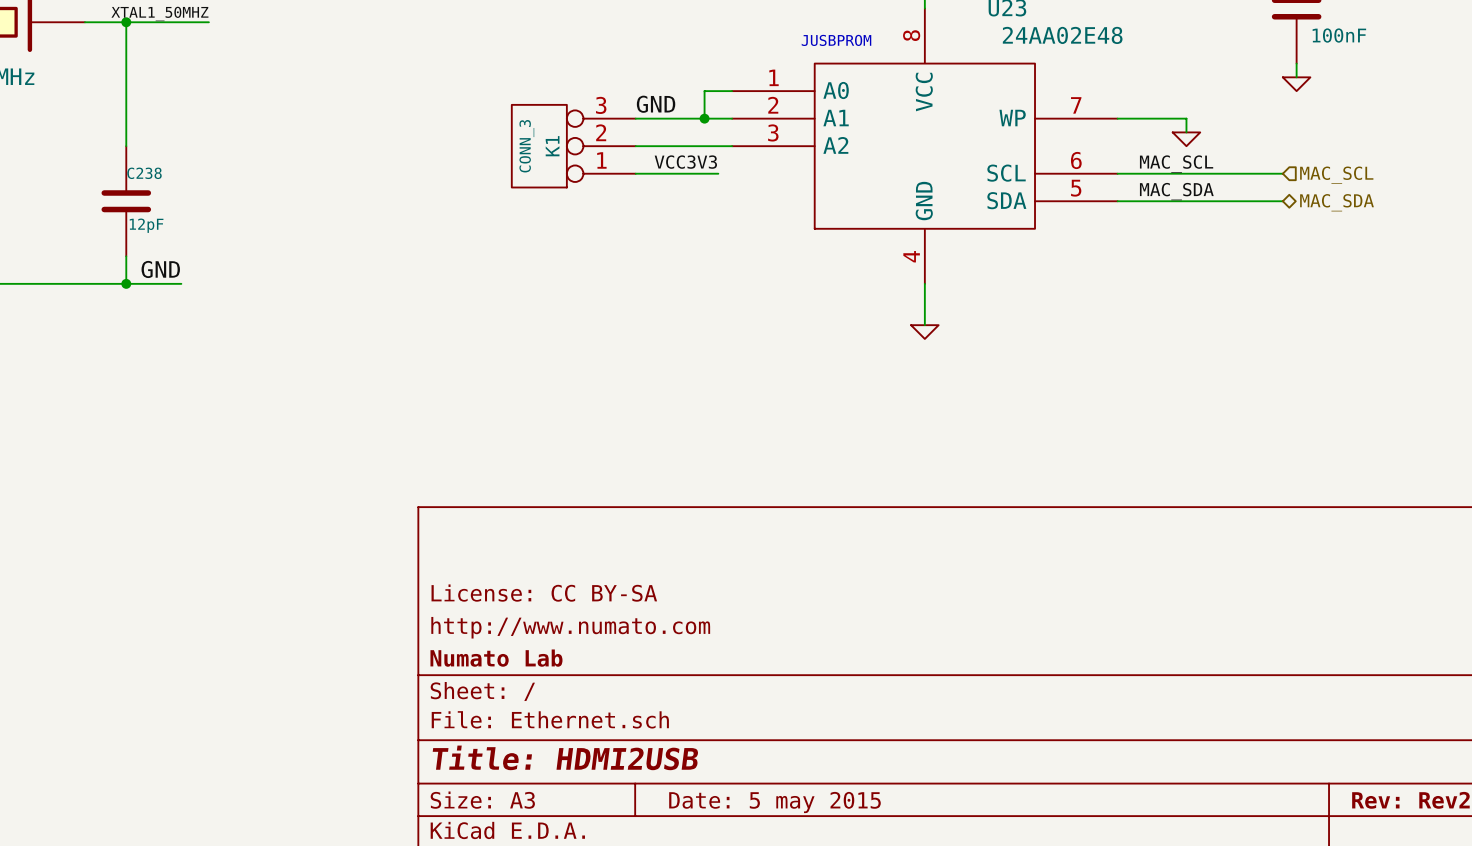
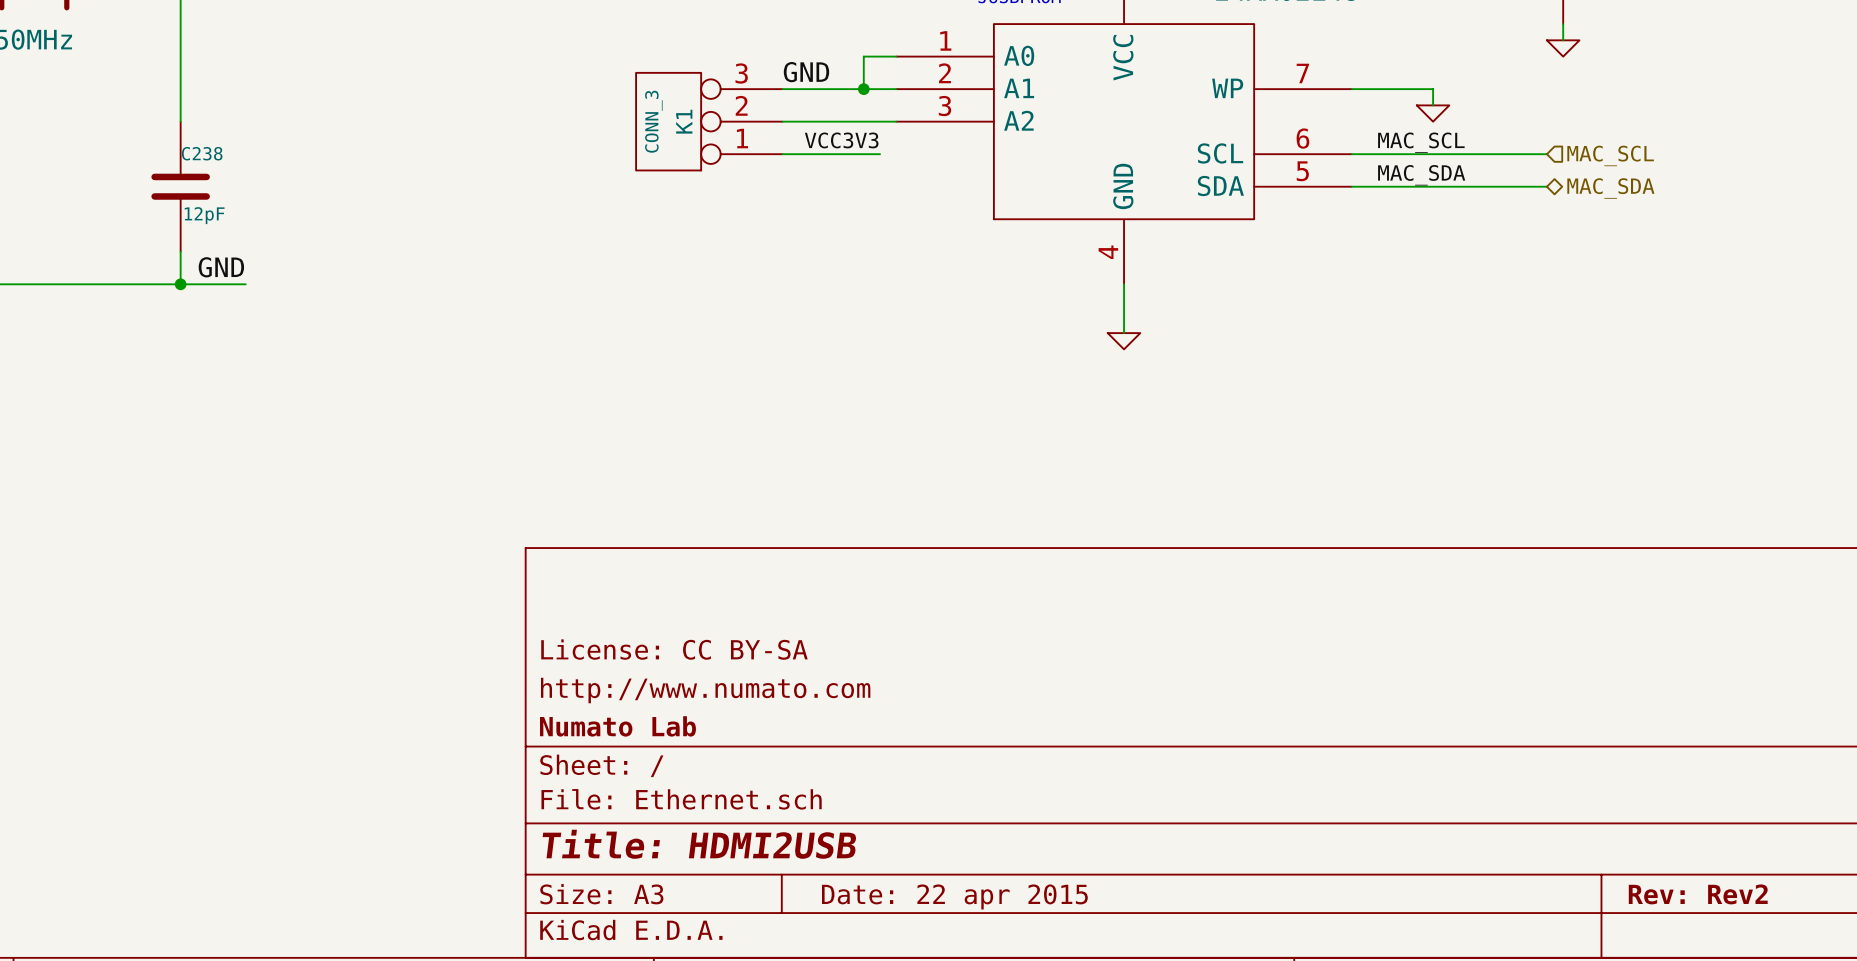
title block: Date: 5 may 2015 (774, 802) -> Date: 22 apr 2015 (954, 896)

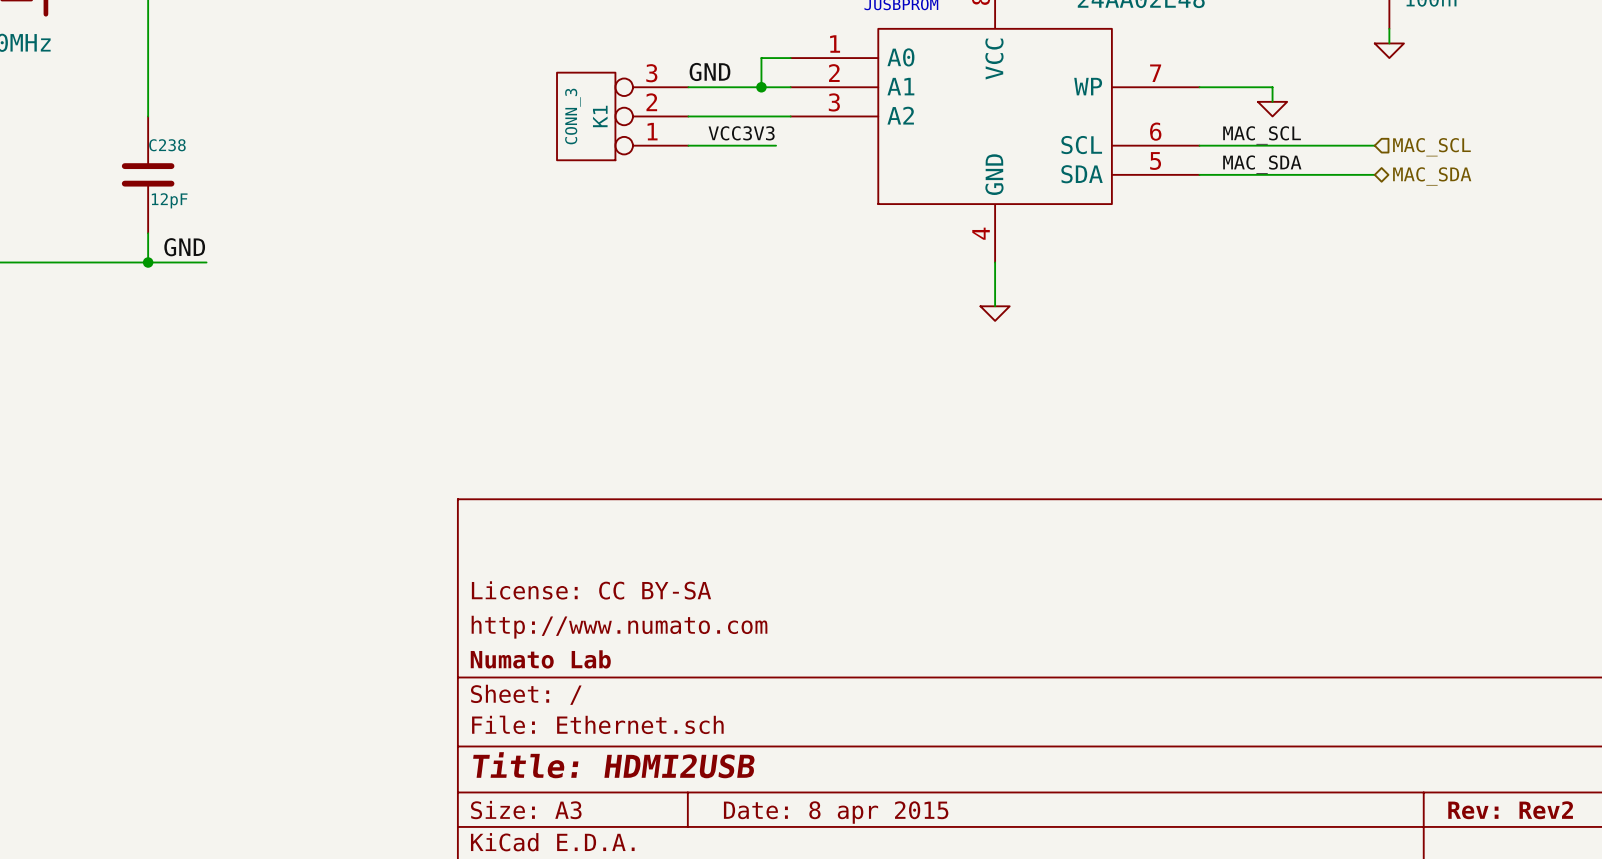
title block: Date: 22 apr 2015 (954, 896) -> Date: 8 apr 2015 (836, 812)

